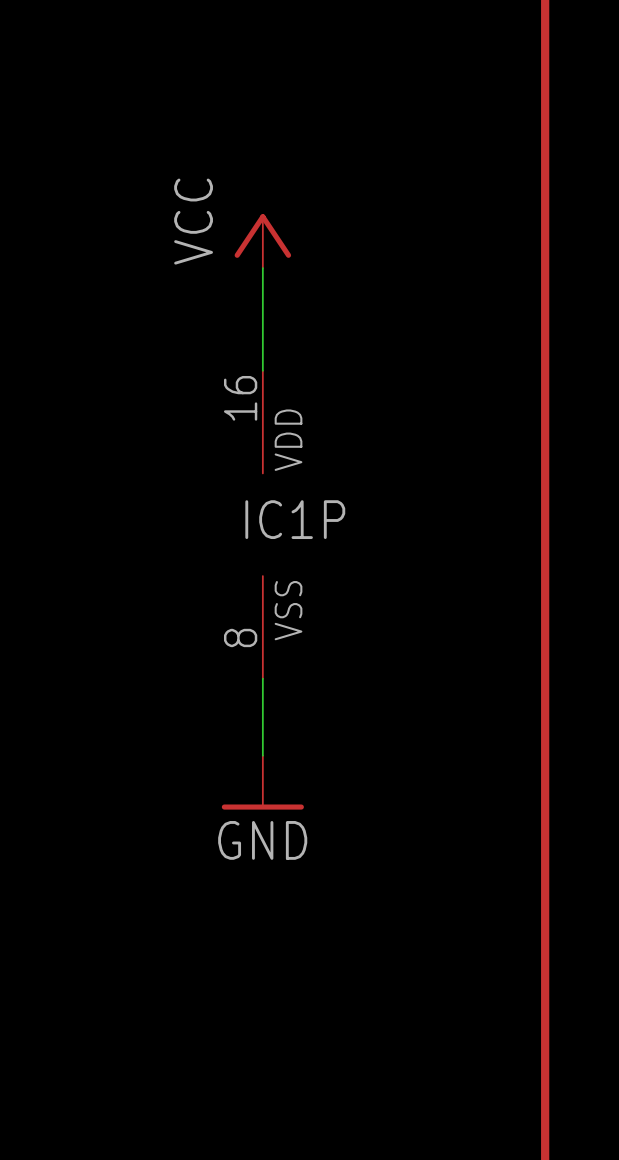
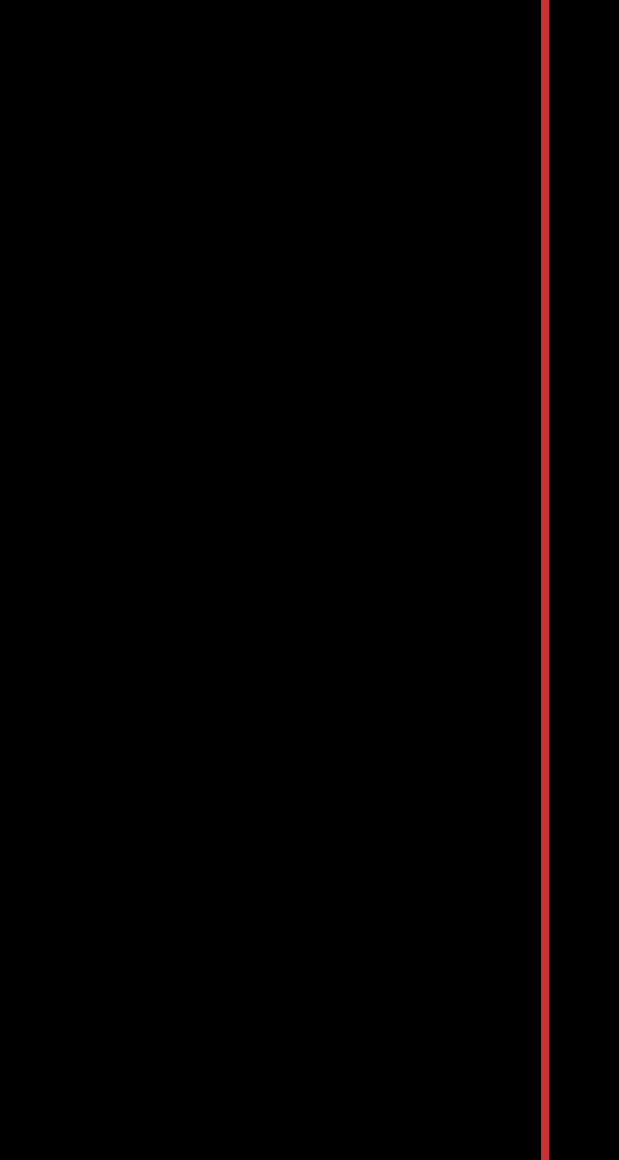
power symbol: VCC (262, 241) -> none
wire: (262, 268) (262, 370) -> none
IC1P: (262, 524) -> none
wire: (262, 678) (262, 755) -> none
power symbol: GND (262, 782) -> none

